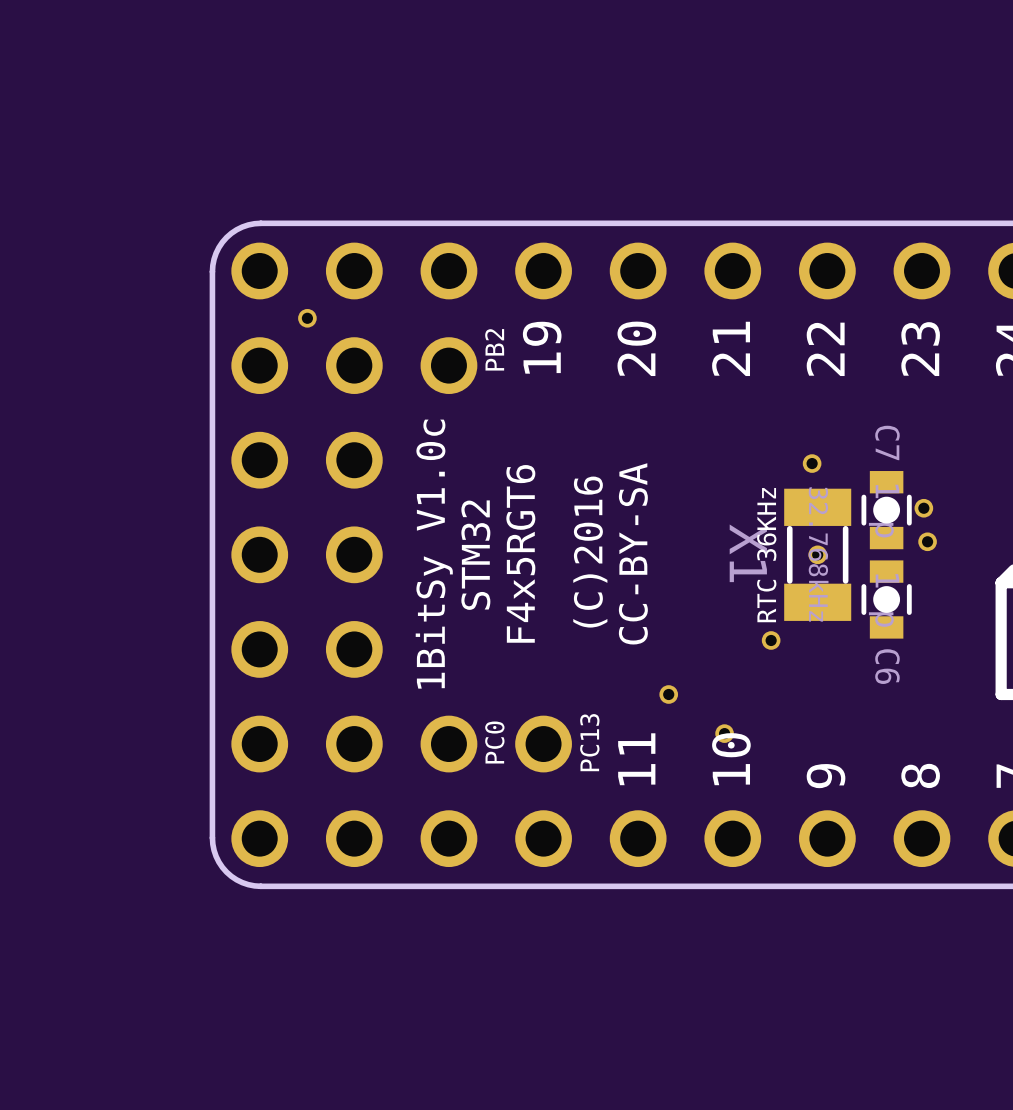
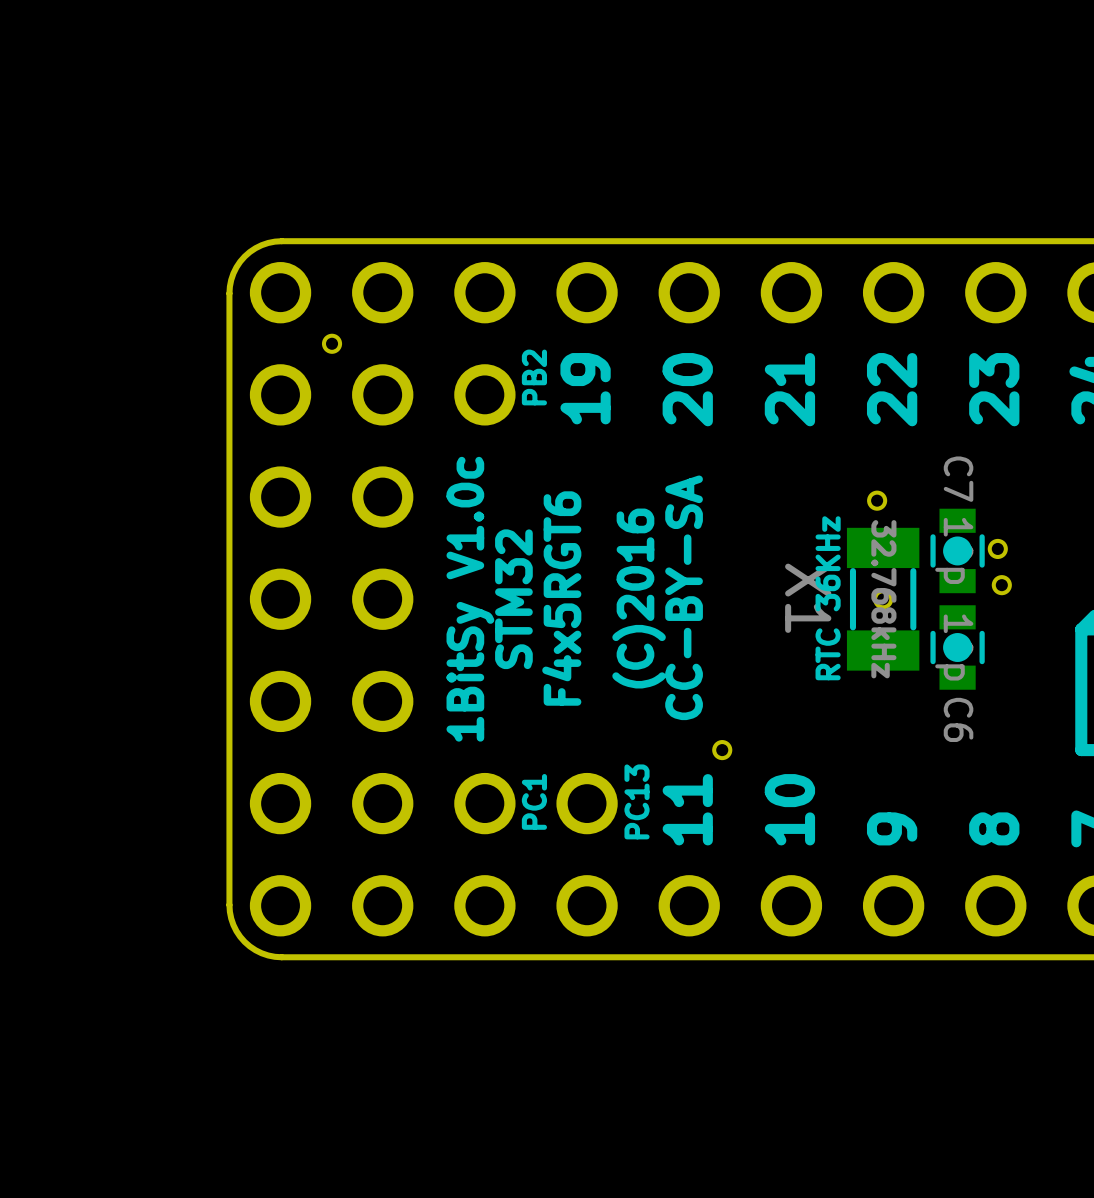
part: (771, 640) -> none
part: (724, 733) -> none
text: PC0 (494, 742) -> PC1 (534, 801)

